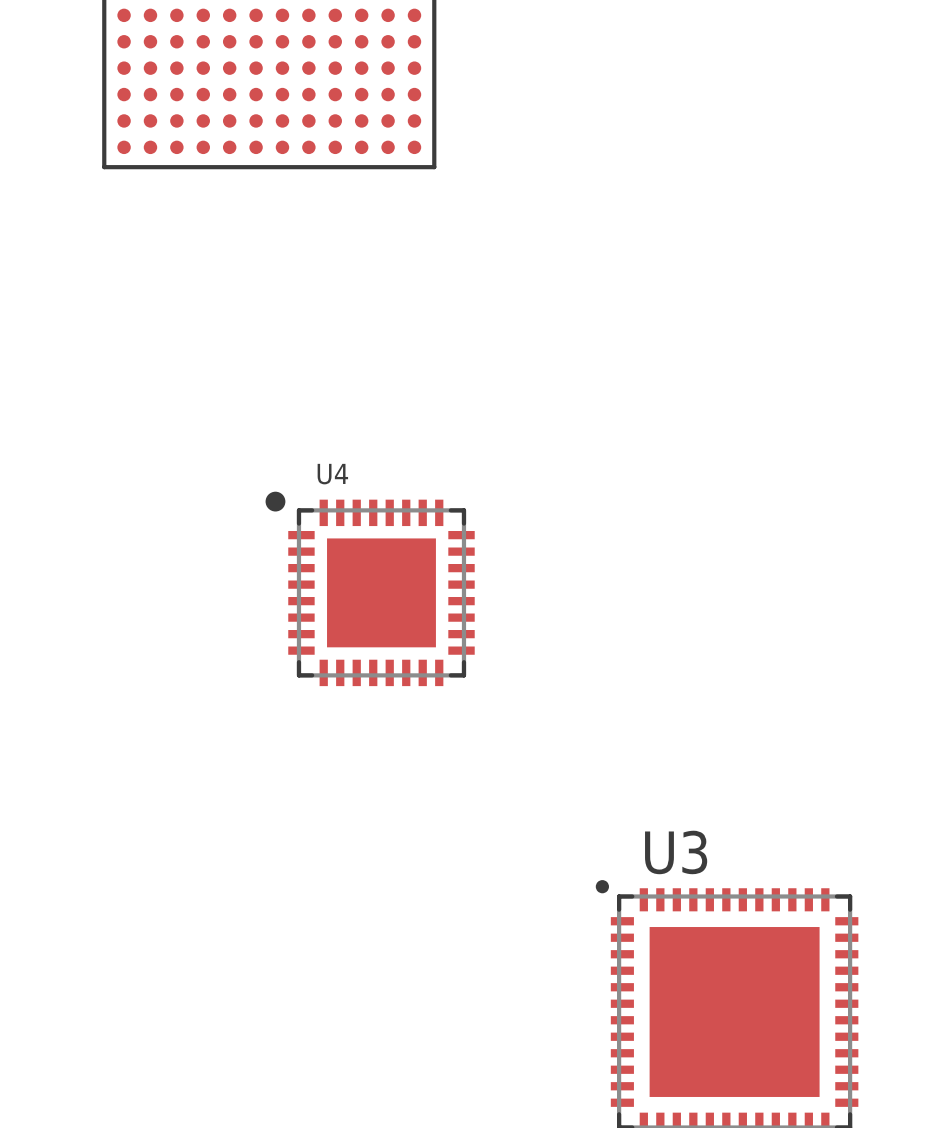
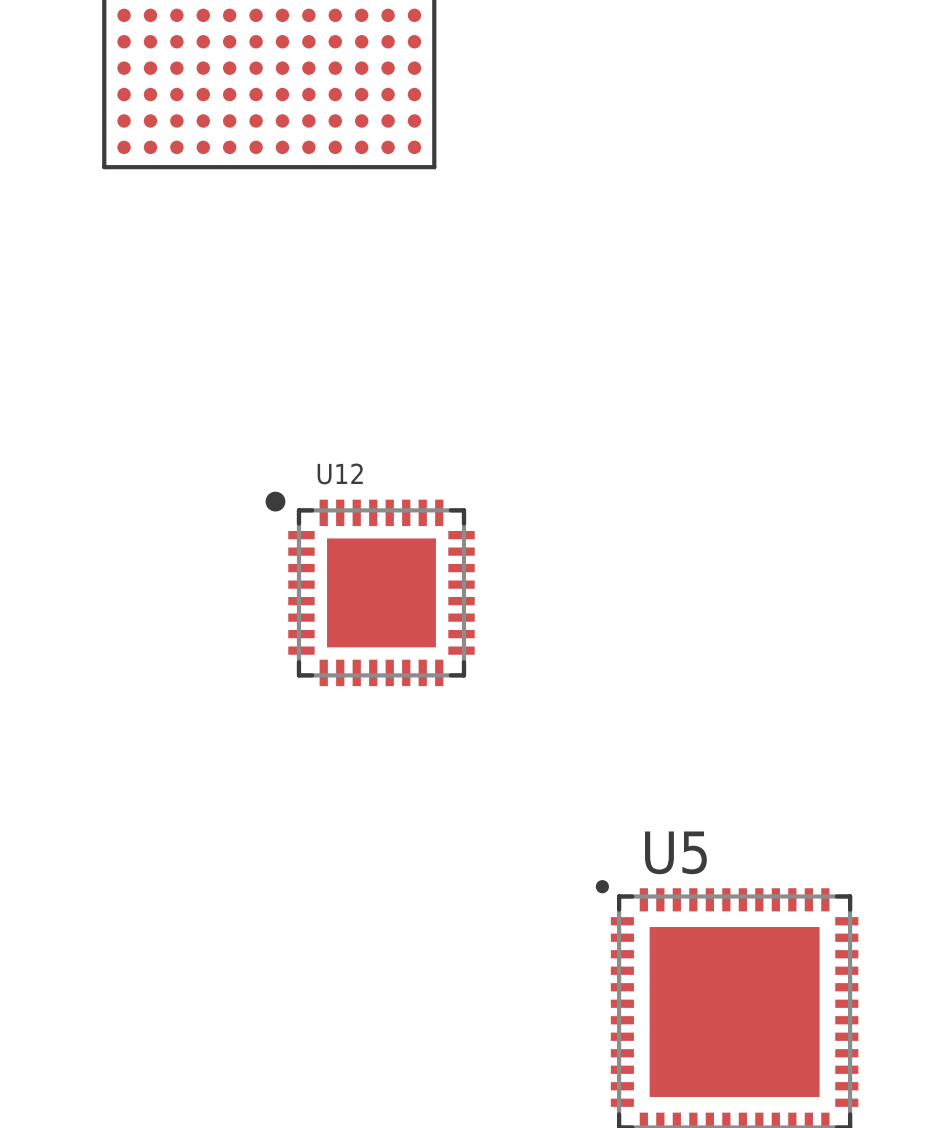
U4 name: U4 (332, 474) -> U12 (340, 473)
U3 name: U3 (676, 852) -> U5 (675, 852)

